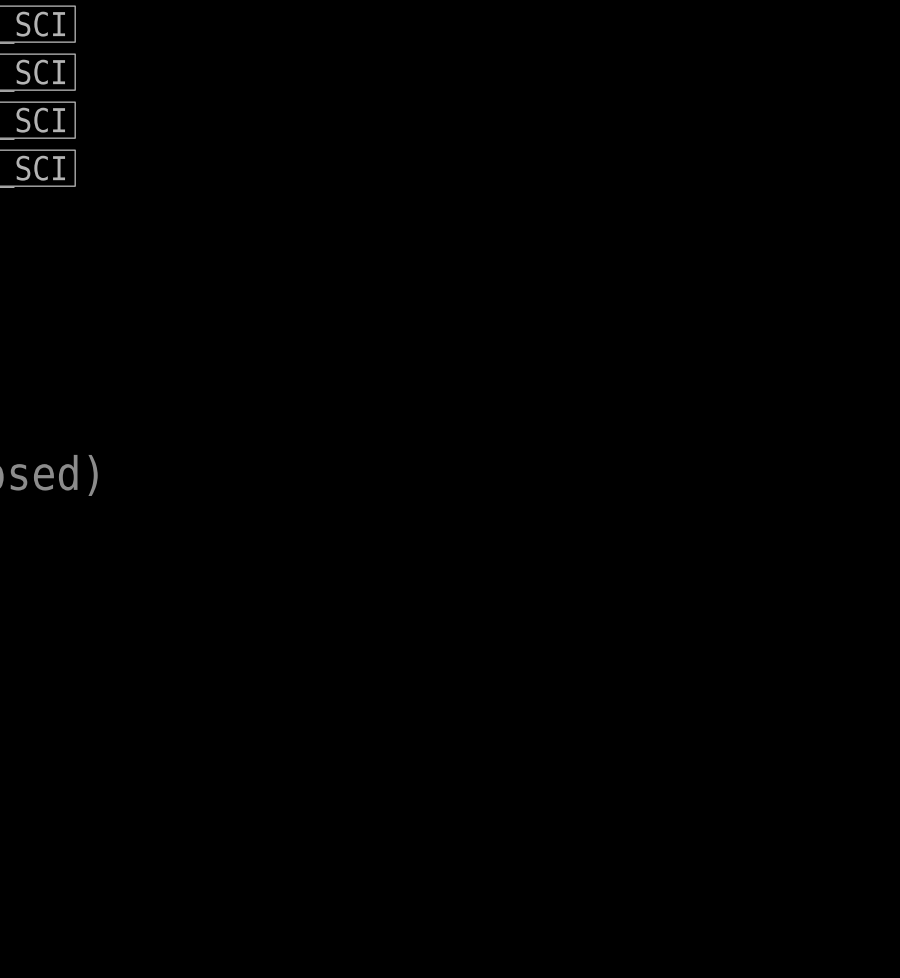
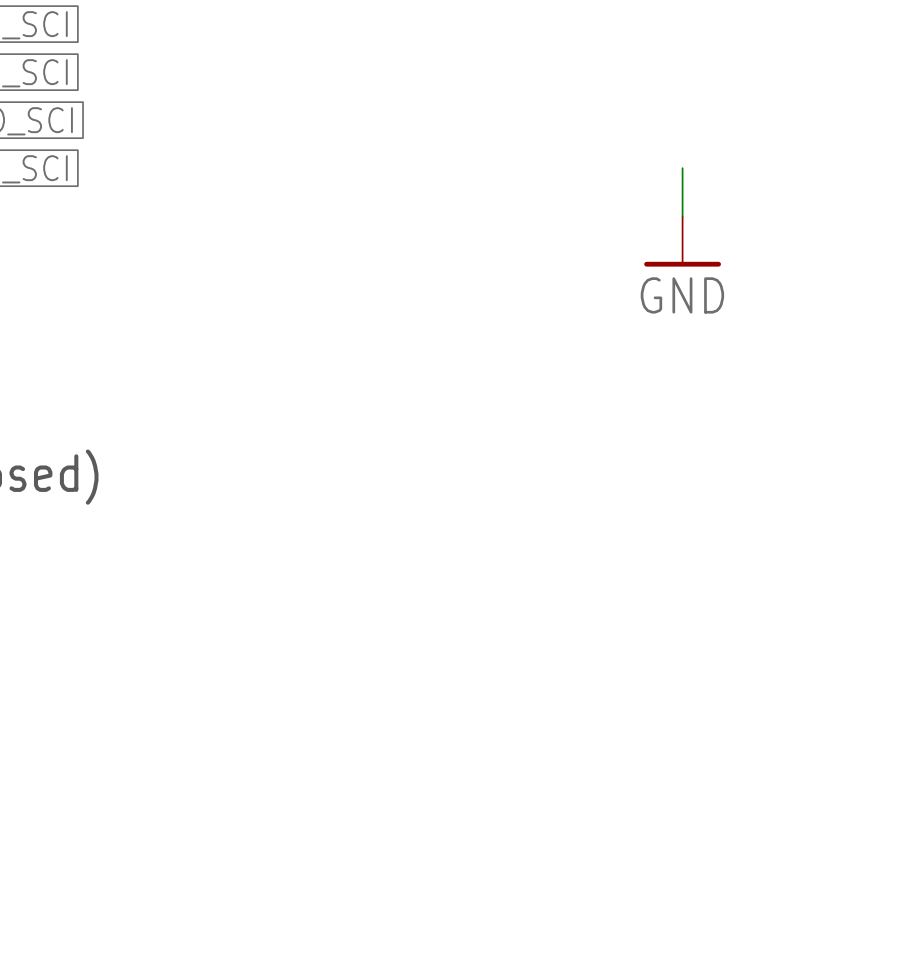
wire: none -> (682, 168) (682, 216)
power symbol: none -> GND (682, 241)

